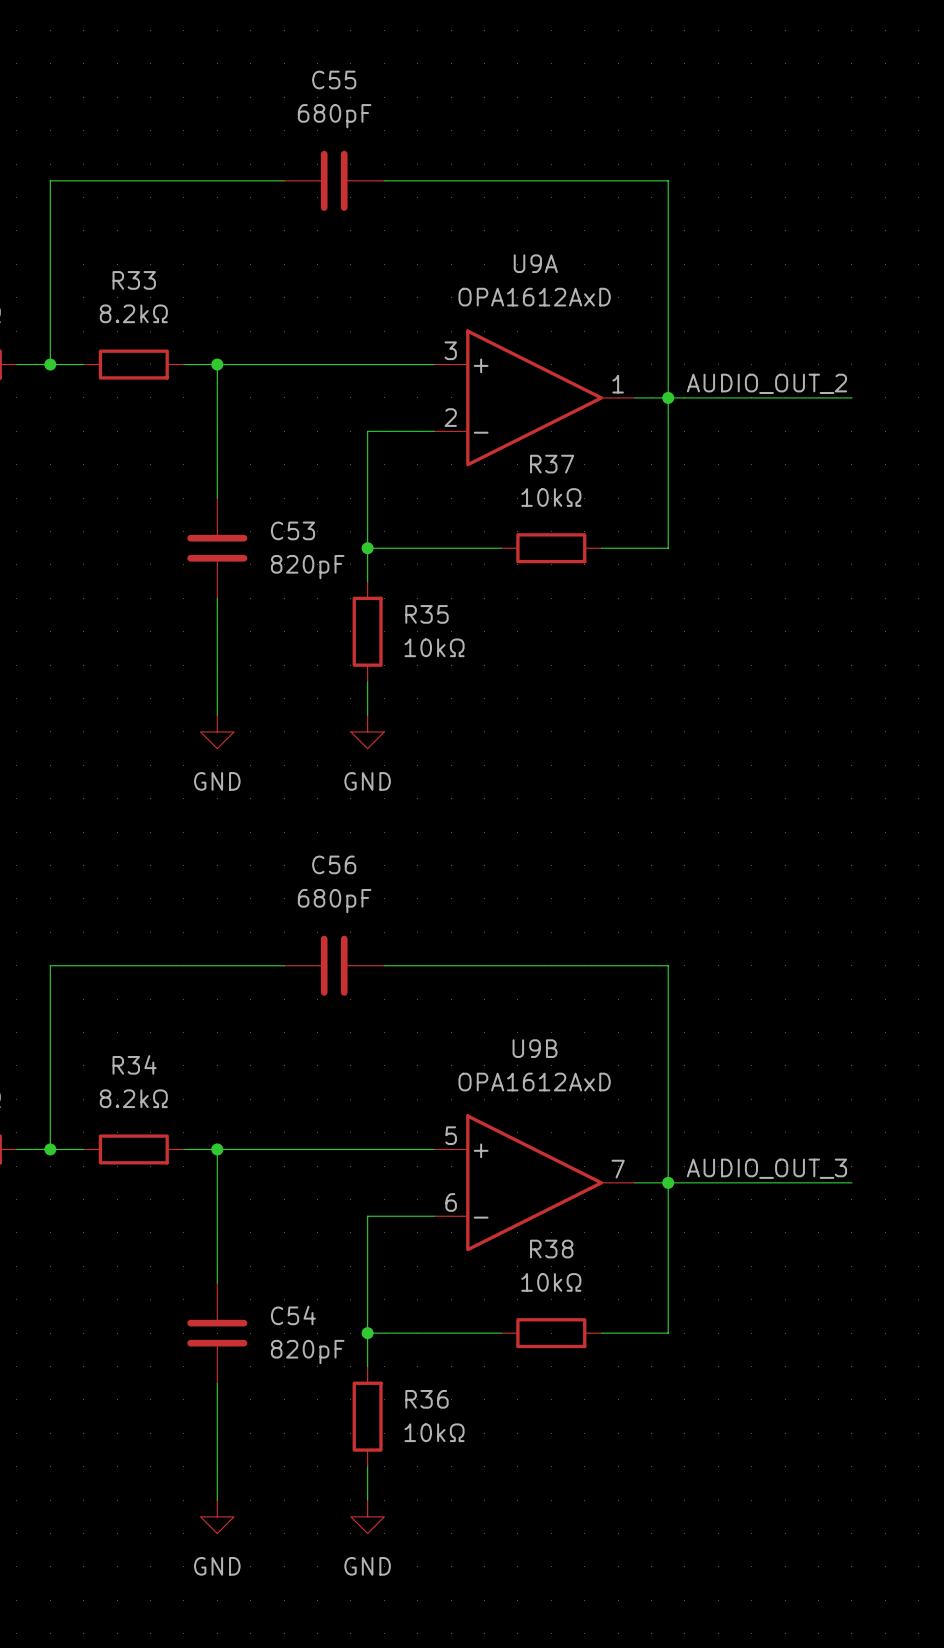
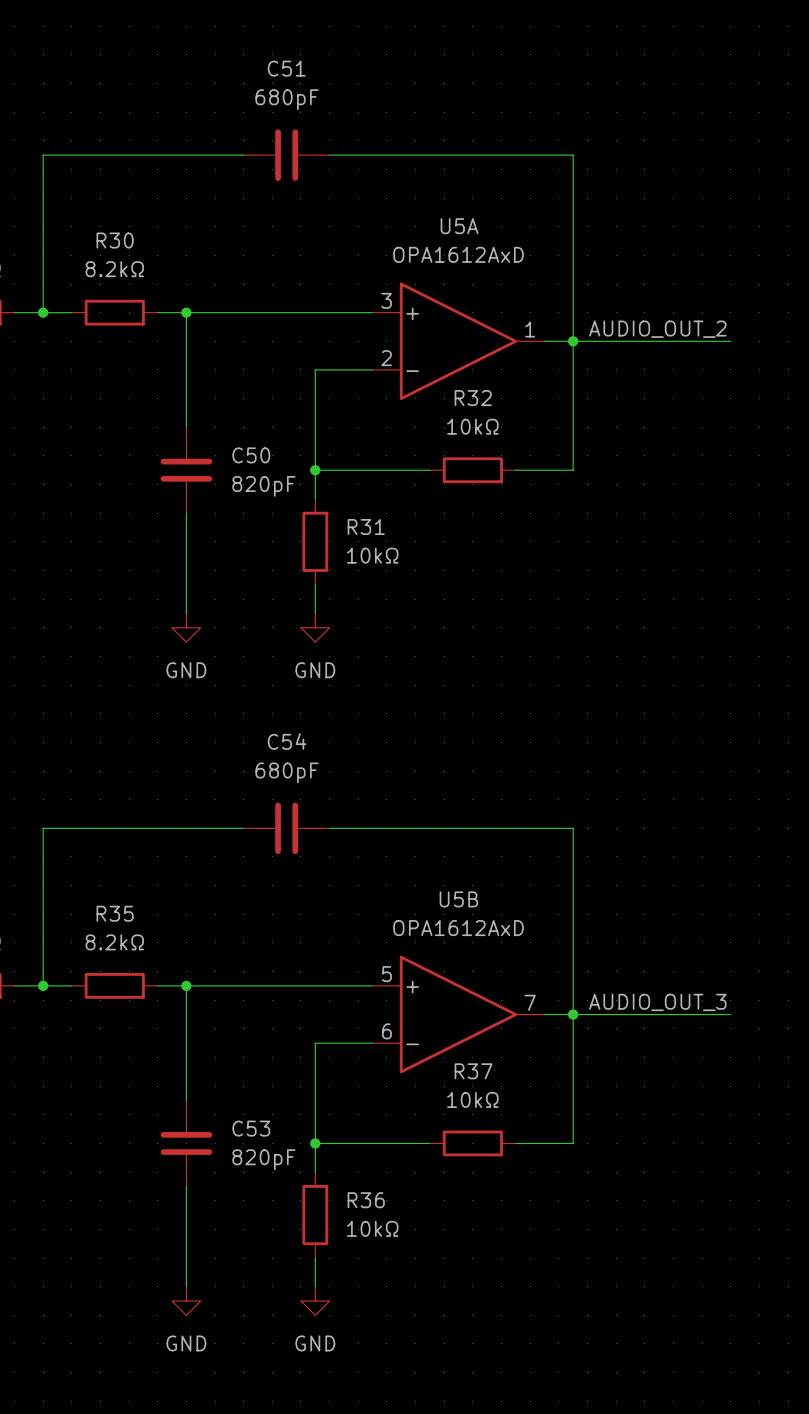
C55 name: C55 (334, 80) -> C51 (286, 68)
U9A name: U9A (535, 263) -> U5A (459, 226)
R33 name: R33 (134, 280) -> R30 (115, 240)
R37 name: R37 (552, 464) -> R32 (473, 398)
C53 name: C53 (292, 530) -> C50 (251, 455)
R35 name: R35 (426, 614) -> R31 (366, 526)
C56 name: C56 (334, 864) -> C54 (287, 741)
U9B name: U9B (535, 1048) -> U5B (458, 899)
R34 name: R34 (134, 1064) -> R35 (115, 913)
R38 name: R38 (551, 1249) -> R37 (473, 1071)
C54 name: C54 (293, 1315) -> C53 (251, 1128)

